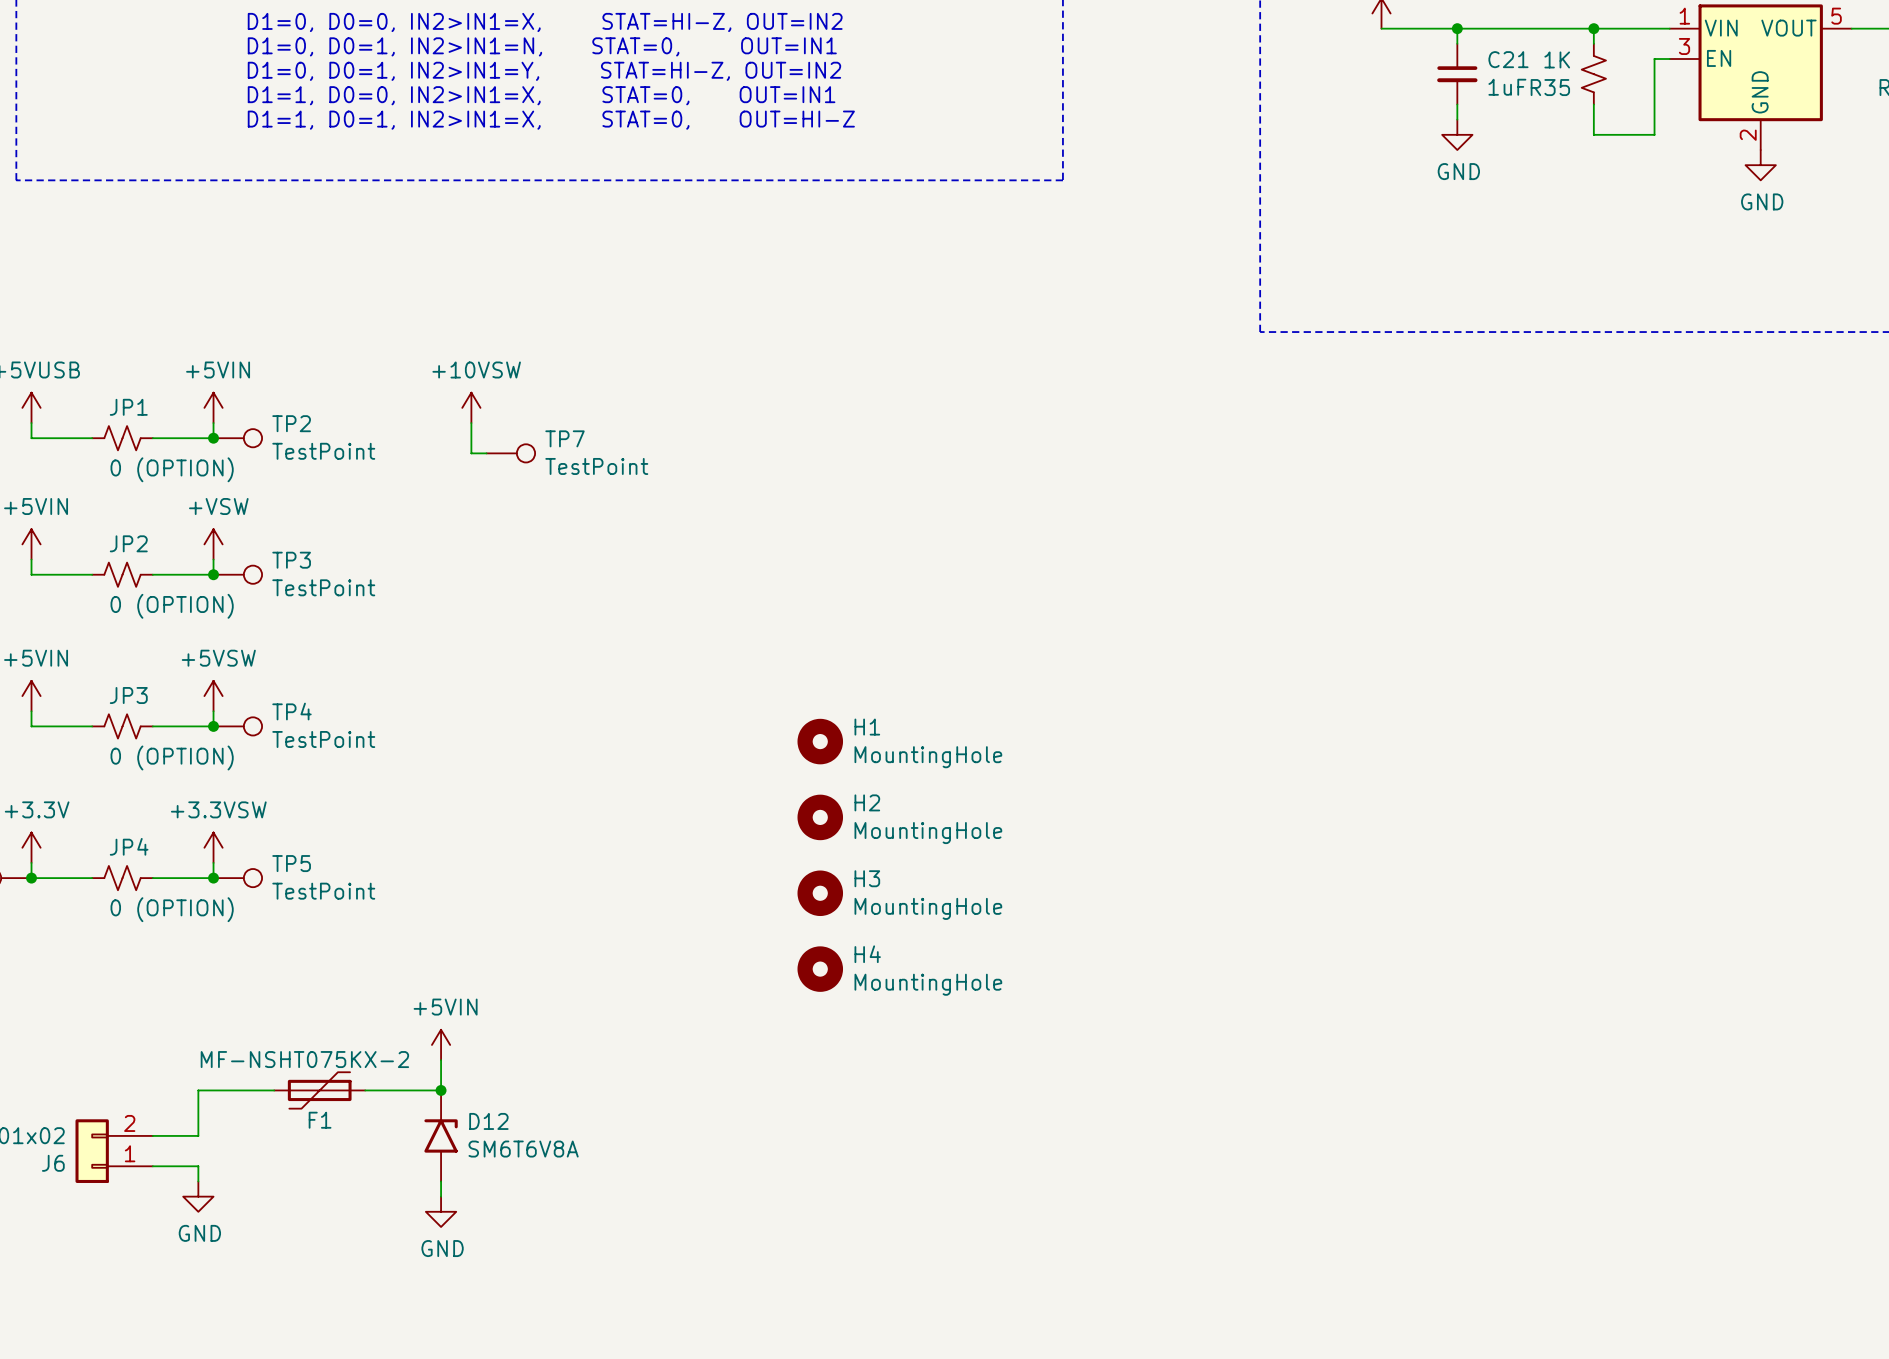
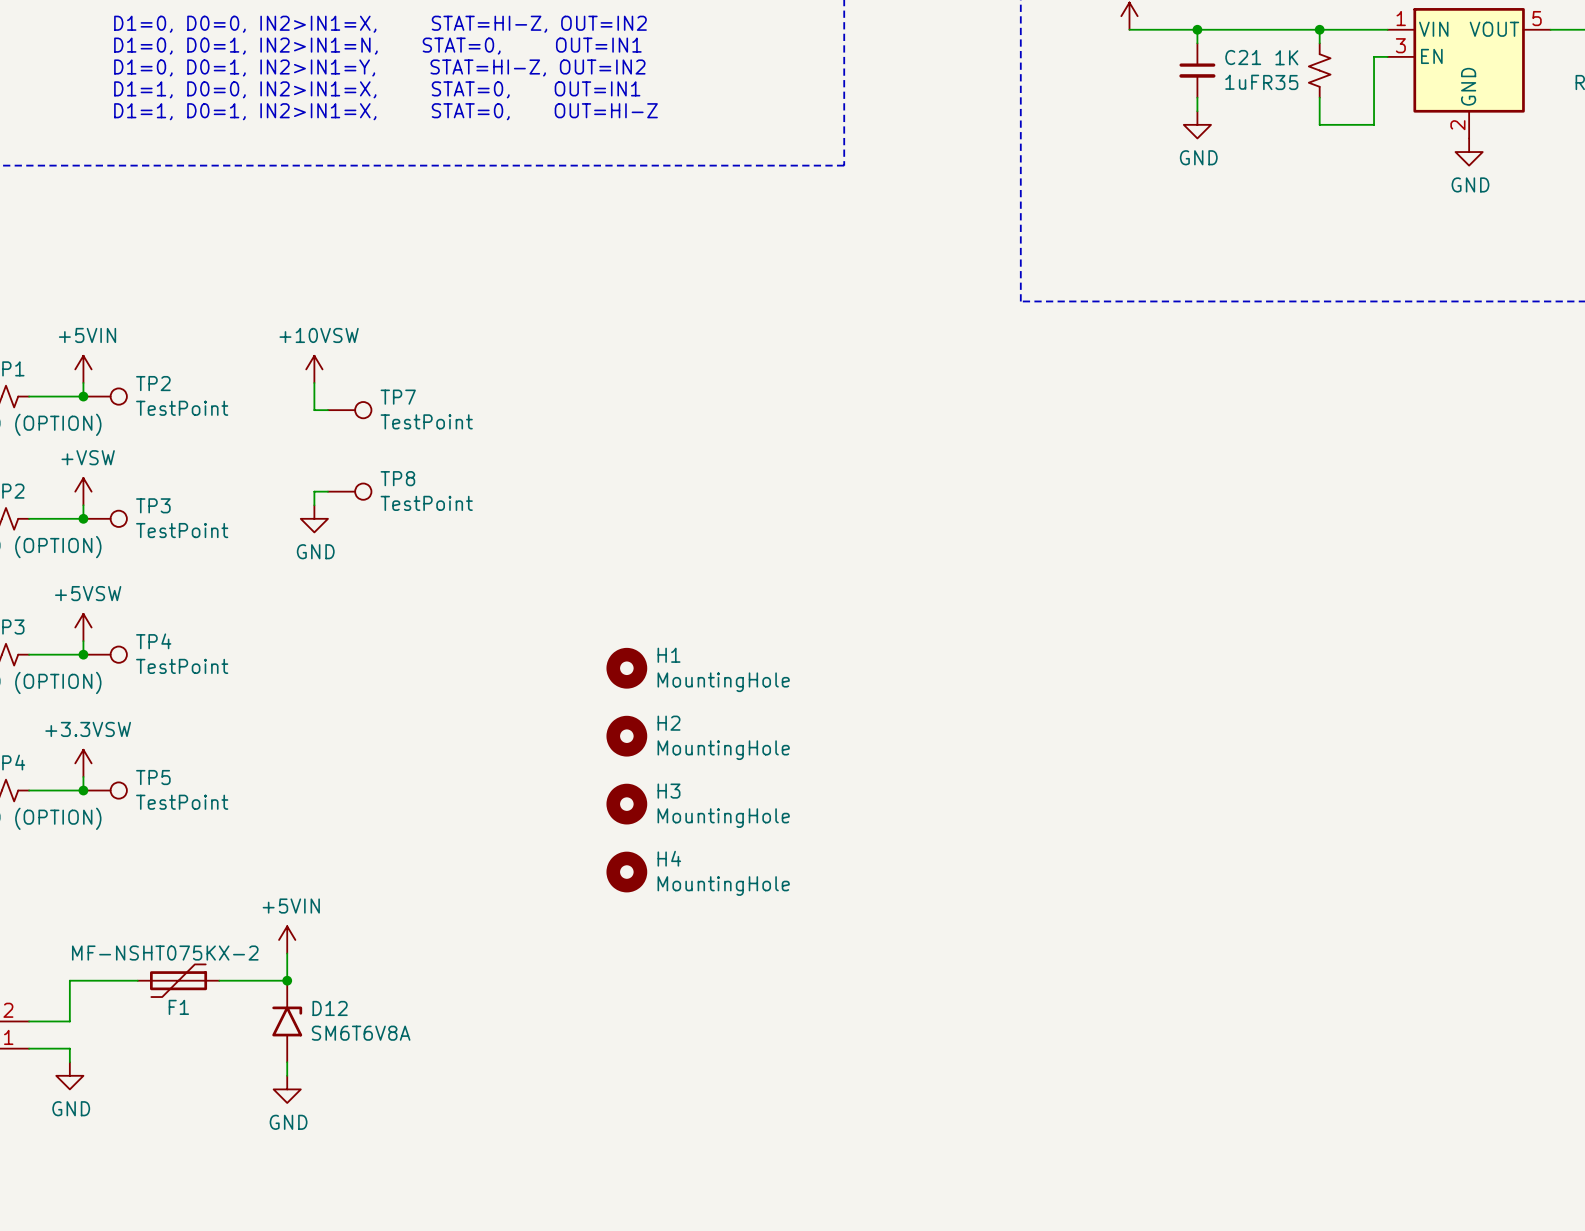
wire: none -> (327, 491) (314, 491) (314, 505)
TP8: none -> TestPoint (349, 491)
power symbol: none -> GND (314, 518)

